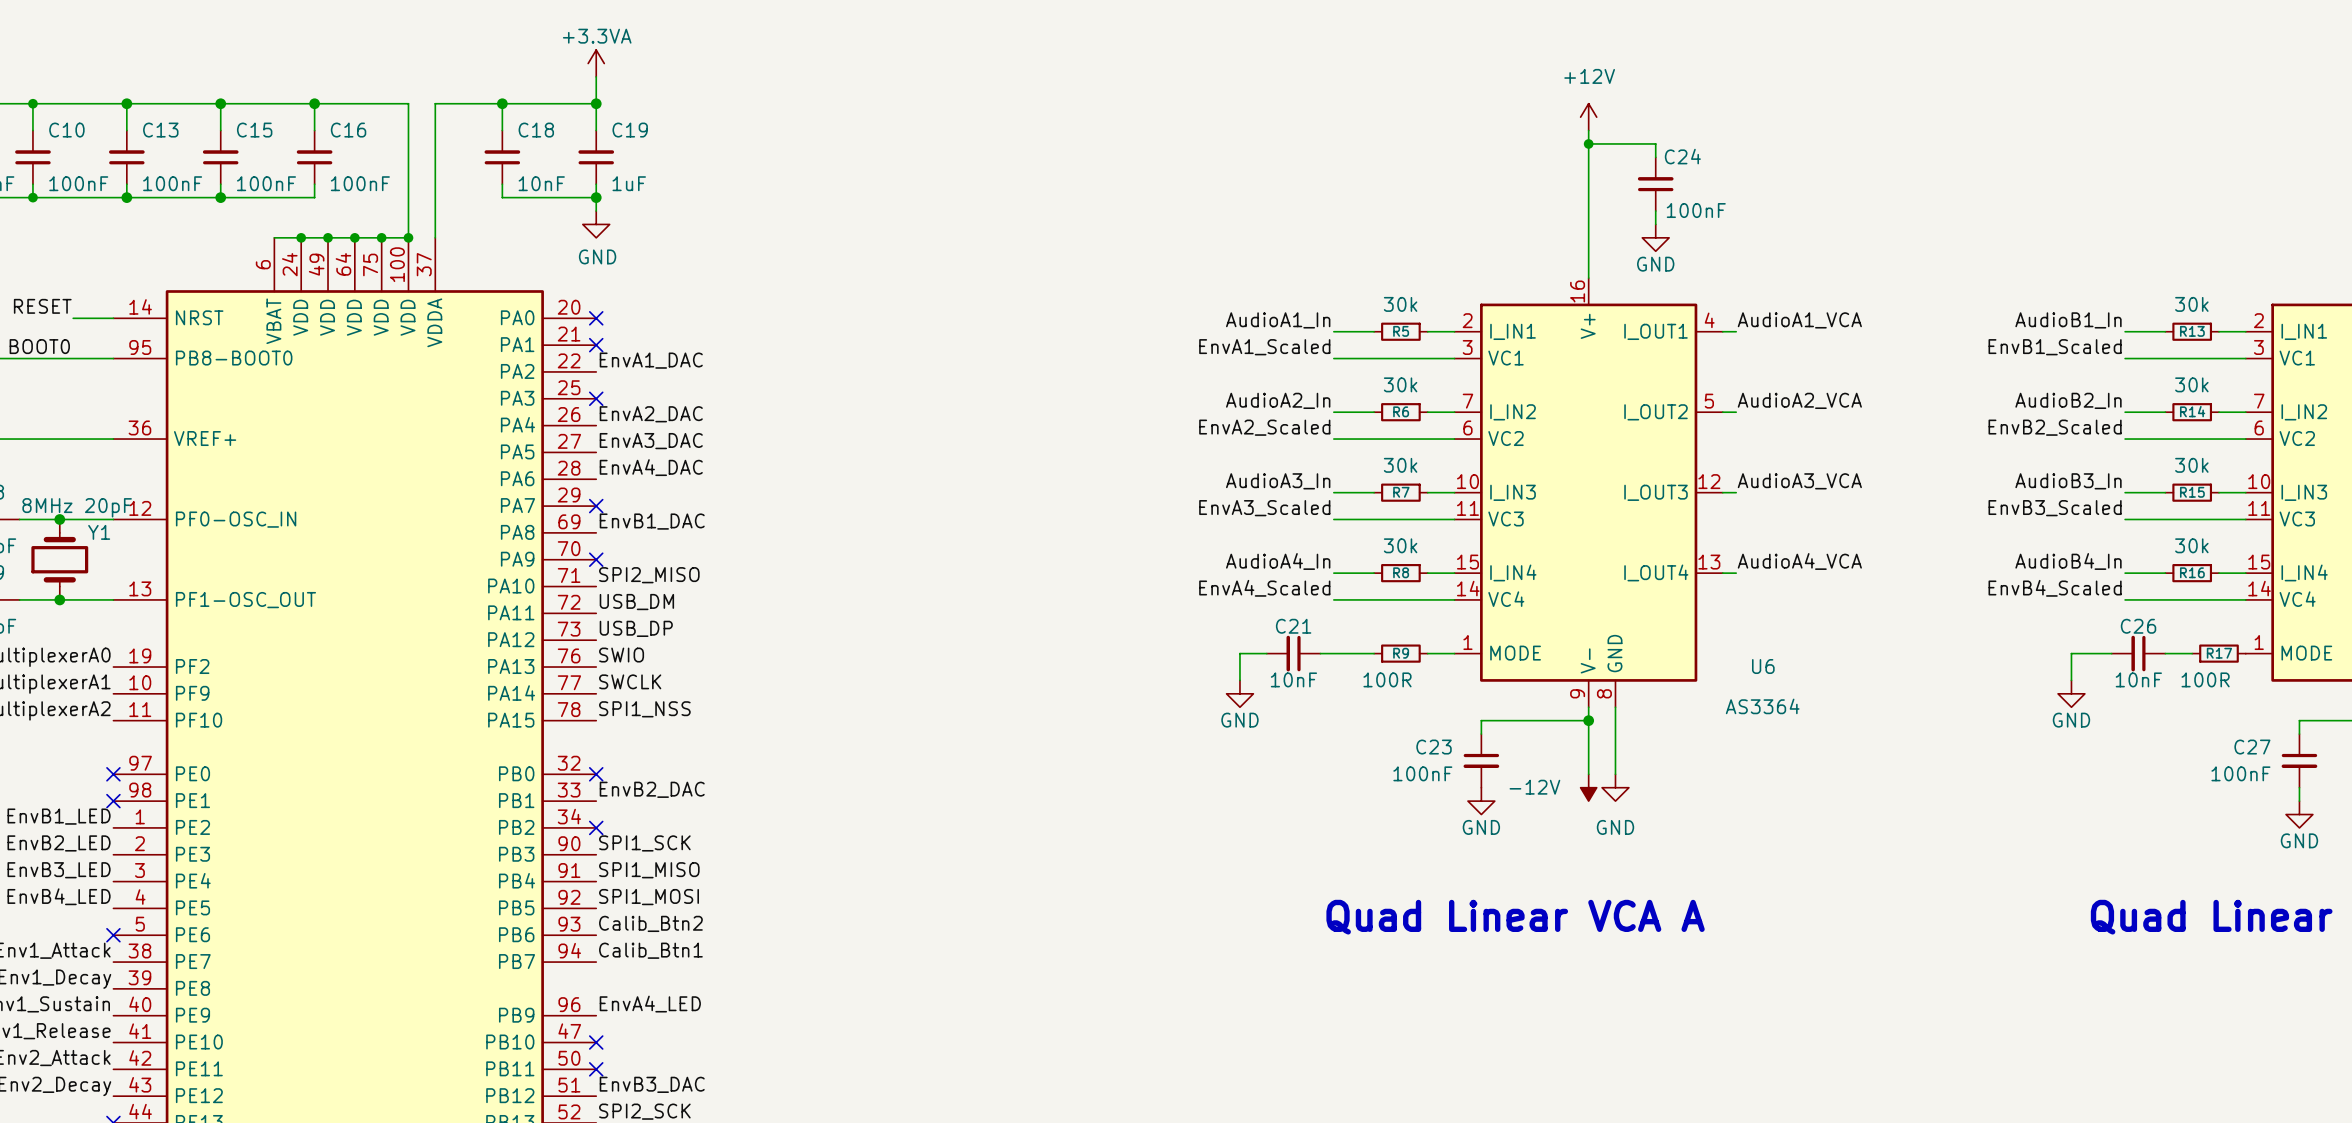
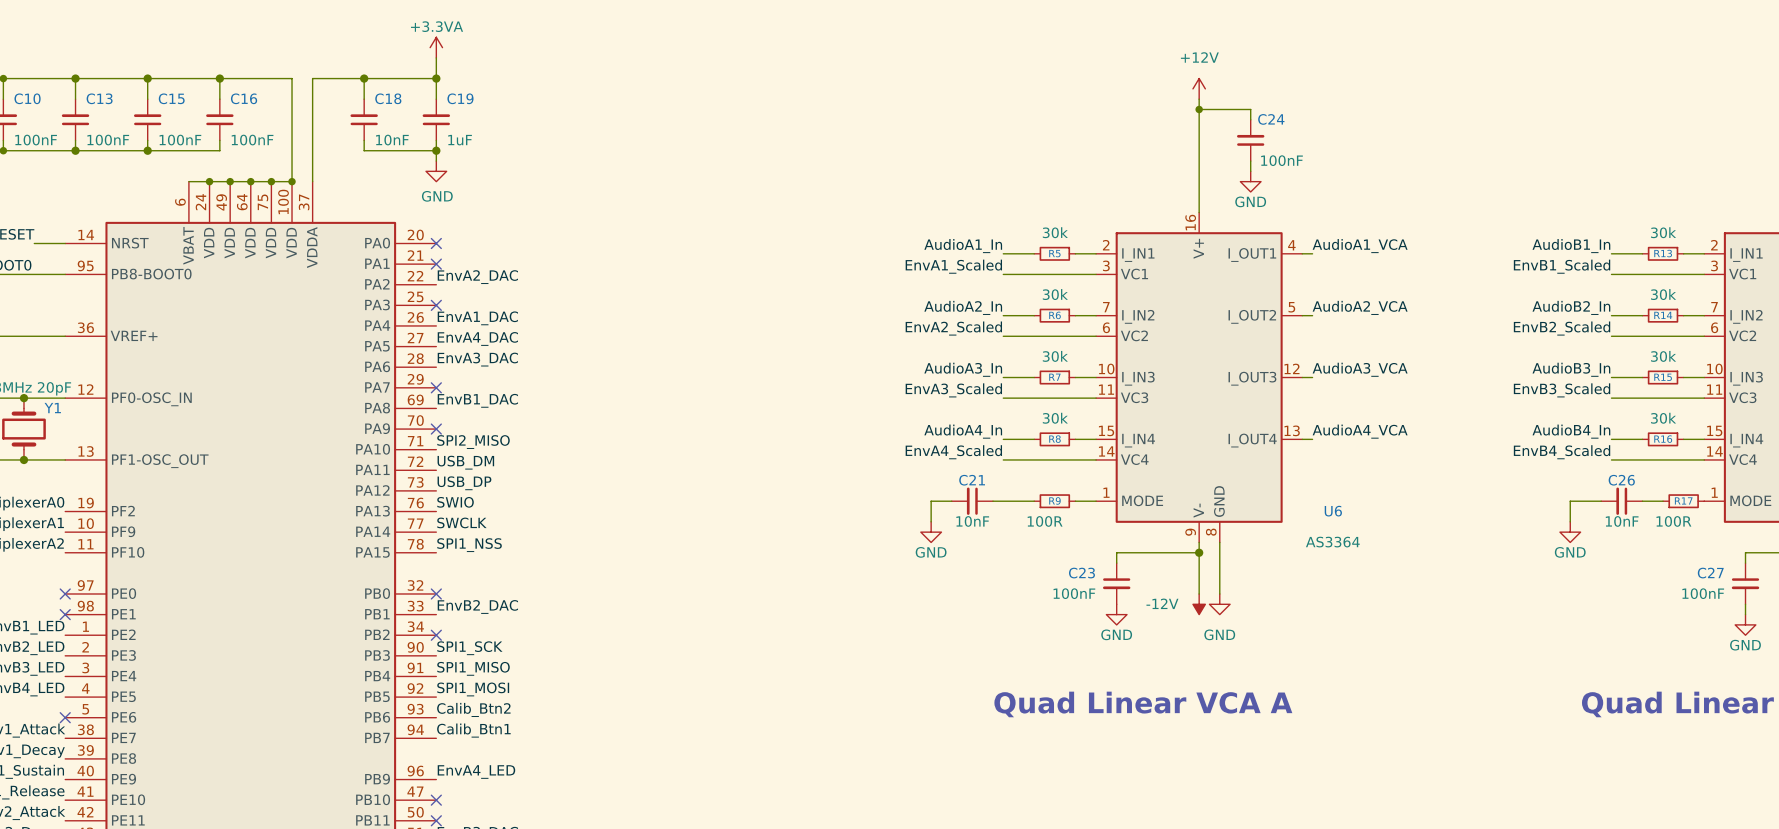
label: EnvA1_DAC (651, 360) -> EnvA2_DAC (477, 277)
label: EnvA2_DAC (651, 414) -> EnvA1_DAC (477, 318)
label: EnvA3_DAC (651, 441) -> EnvA4_DAC (477, 338)
label: EnvA4_DAC (651, 467) -> EnvA3_DAC (477, 359)

